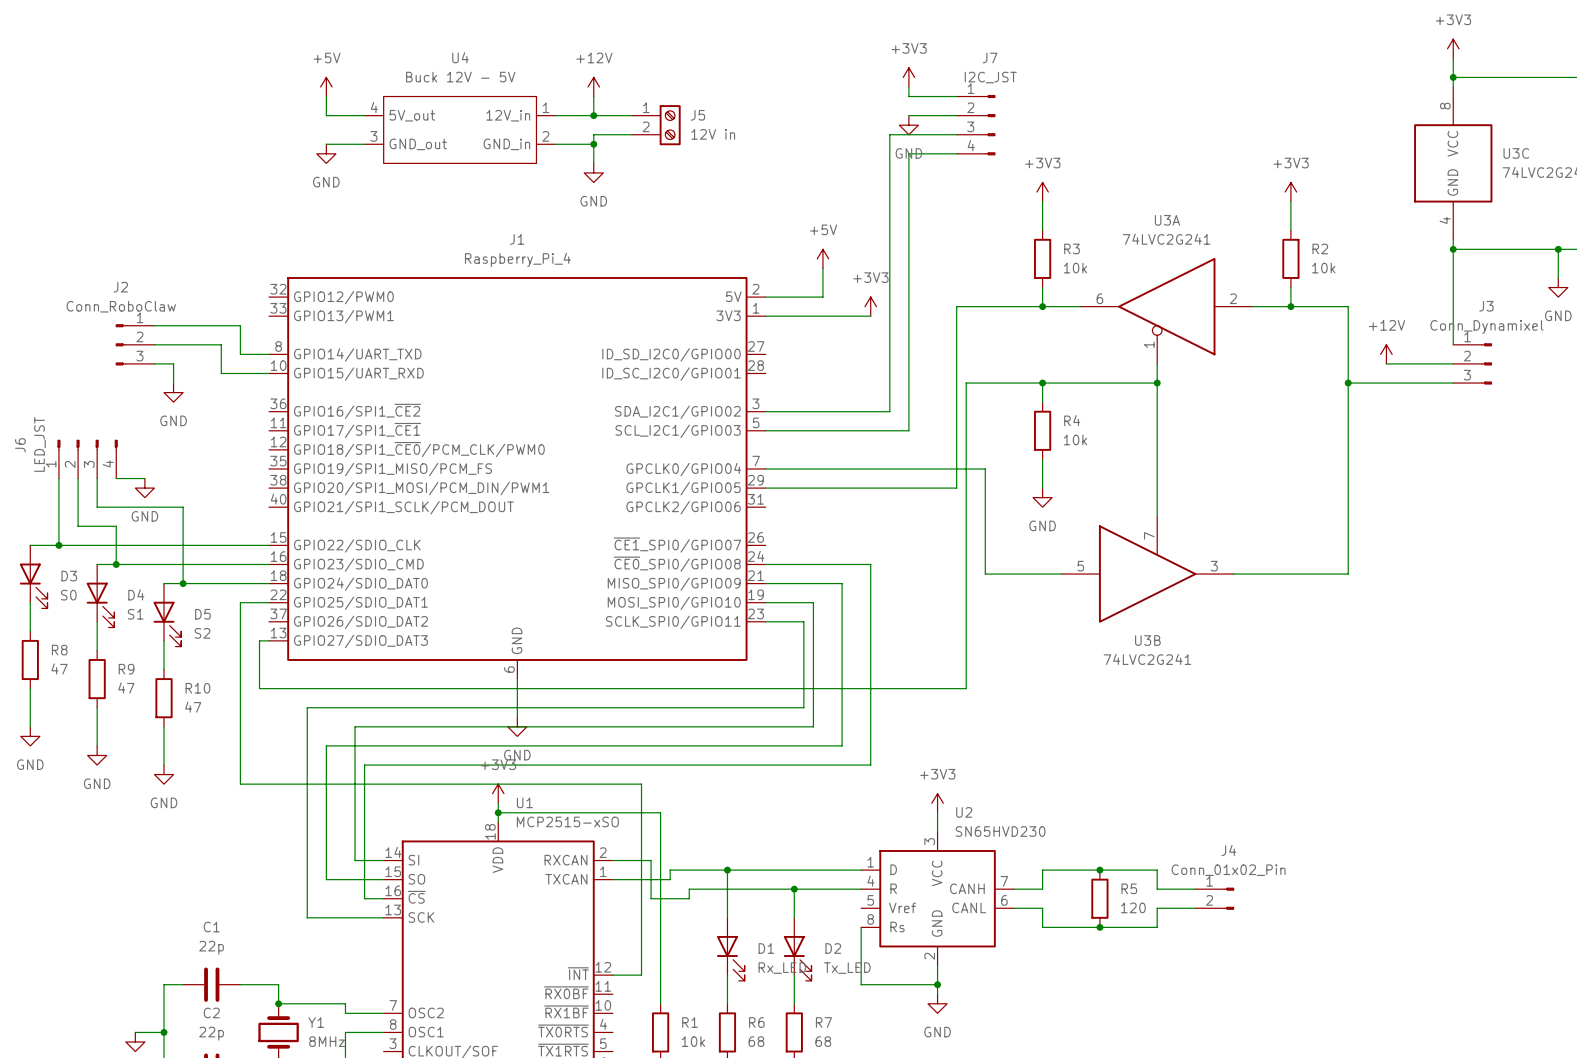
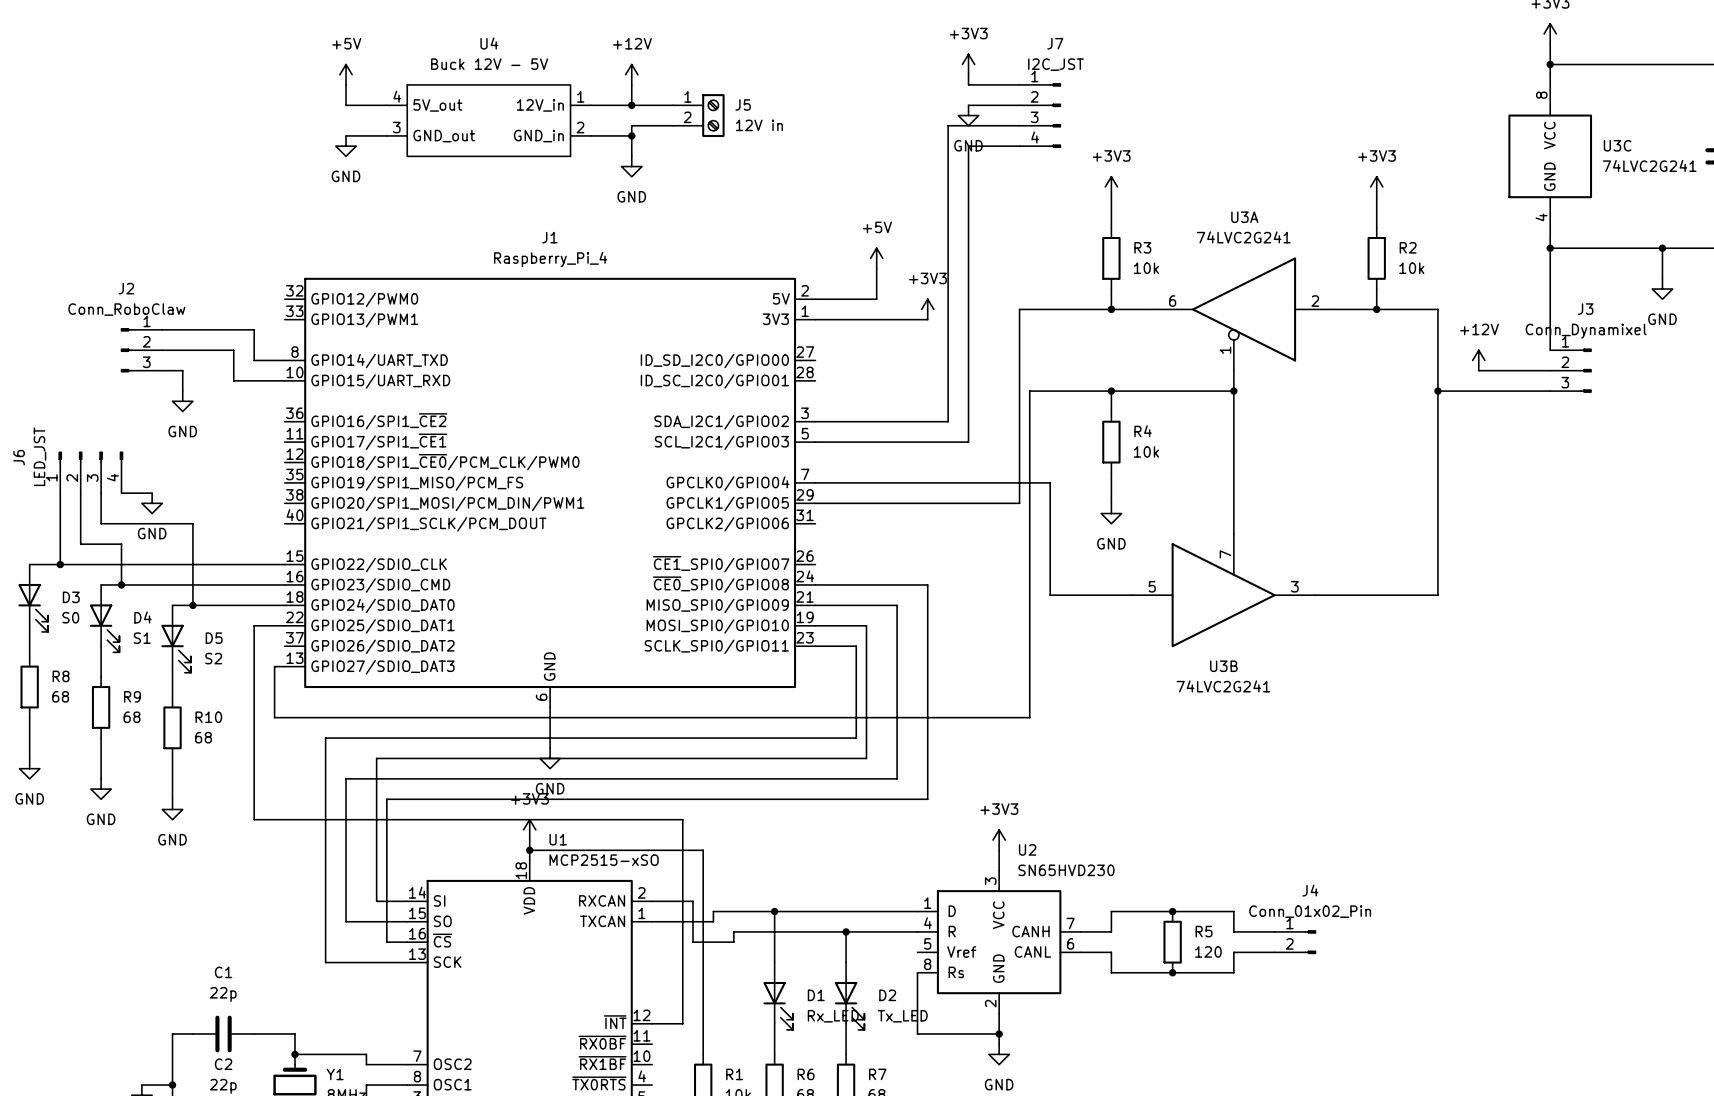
R8 value: 47 (59, 668) -> 68 (60, 696)
R9 value: 47 (126, 688) -> 68 (132, 717)
R10 value: 47 (193, 707) -> 68 (203, 737)

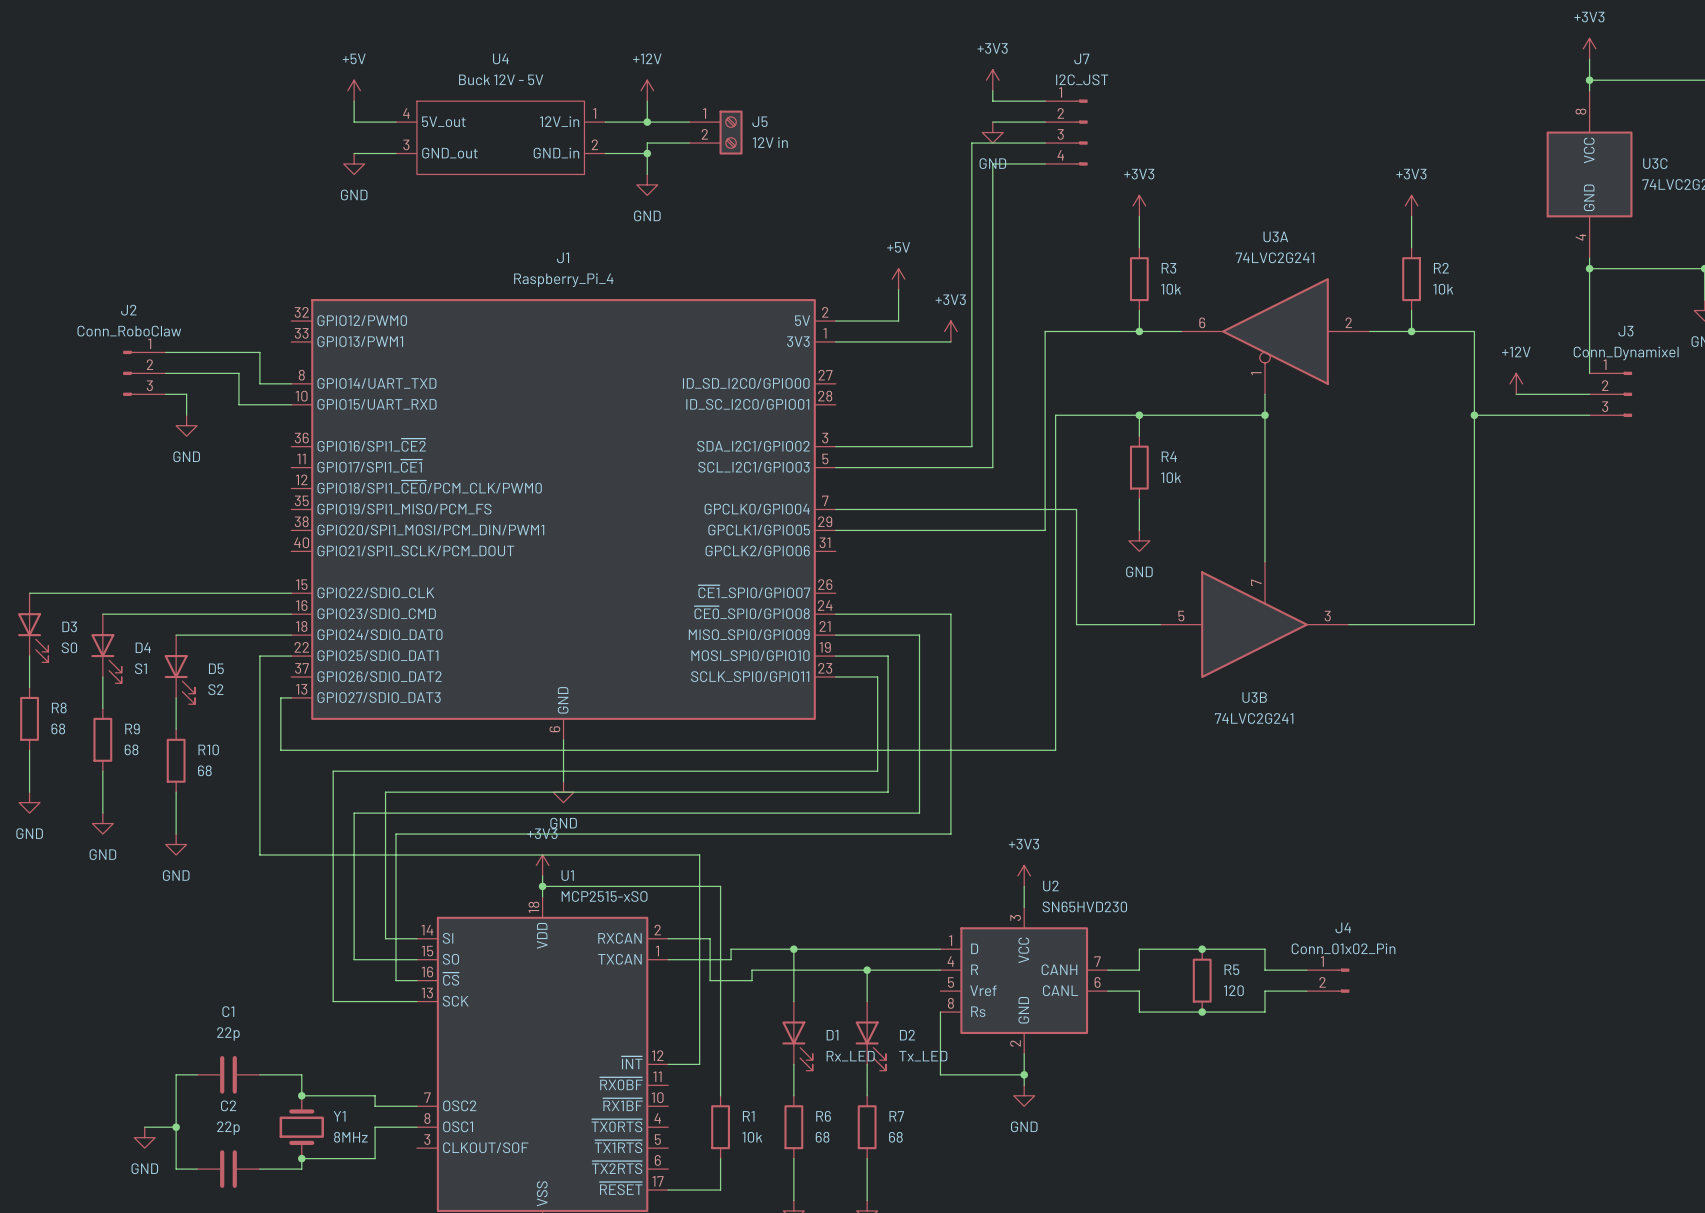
J6: LED_JST (90, 472) -> none
wire: (60, 493) (60, 564) -> none
wire: (80, 493) (80, 544) (121, 544) (121, 584) -> none
wire: (101, 493) (101, 523) (192, 523) (192, 605) -> none
wire: (121, 493) (152, 493) -> none
power symbol: GND (152, 503) -> none
junction: (60, 564) -> none
junction: (121, 584) -> none
junction: (192, 605) -> none

